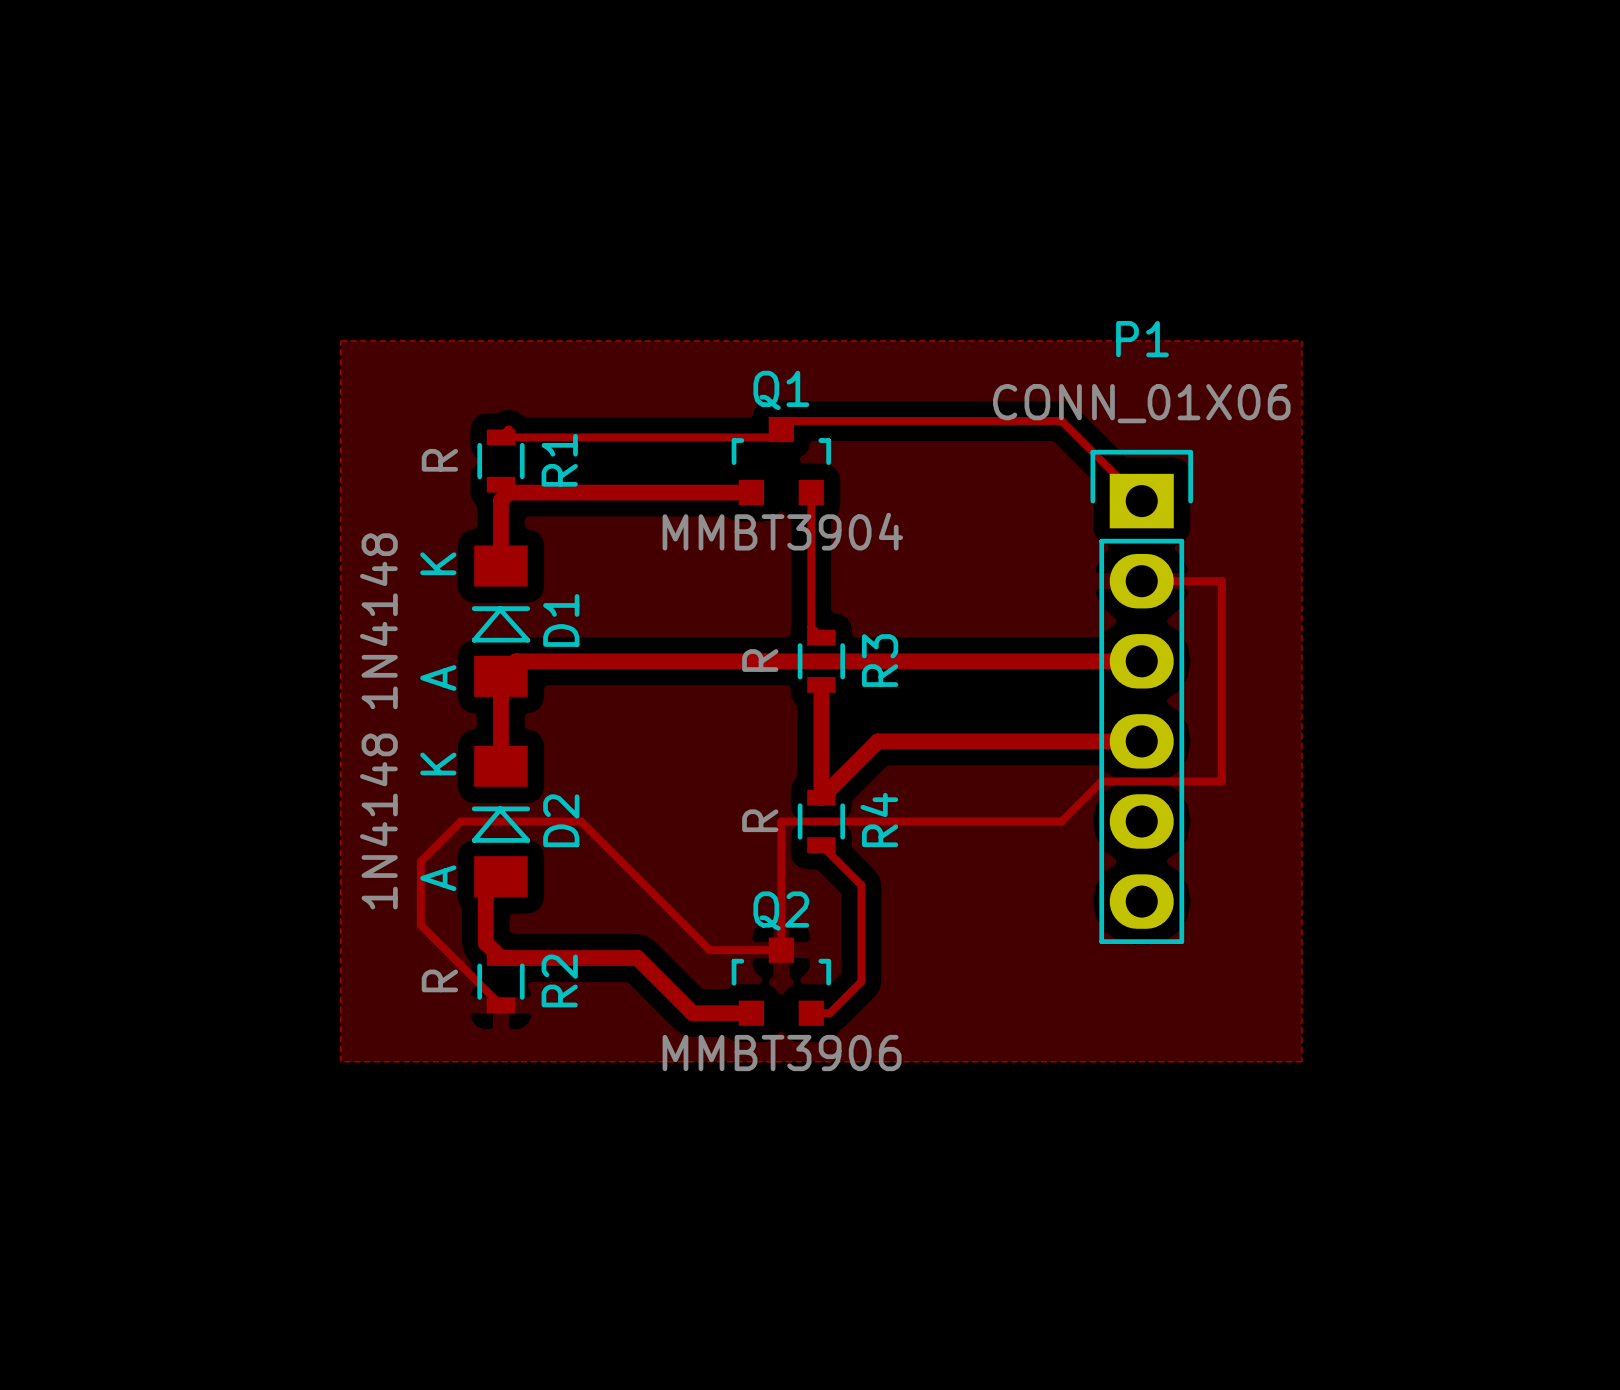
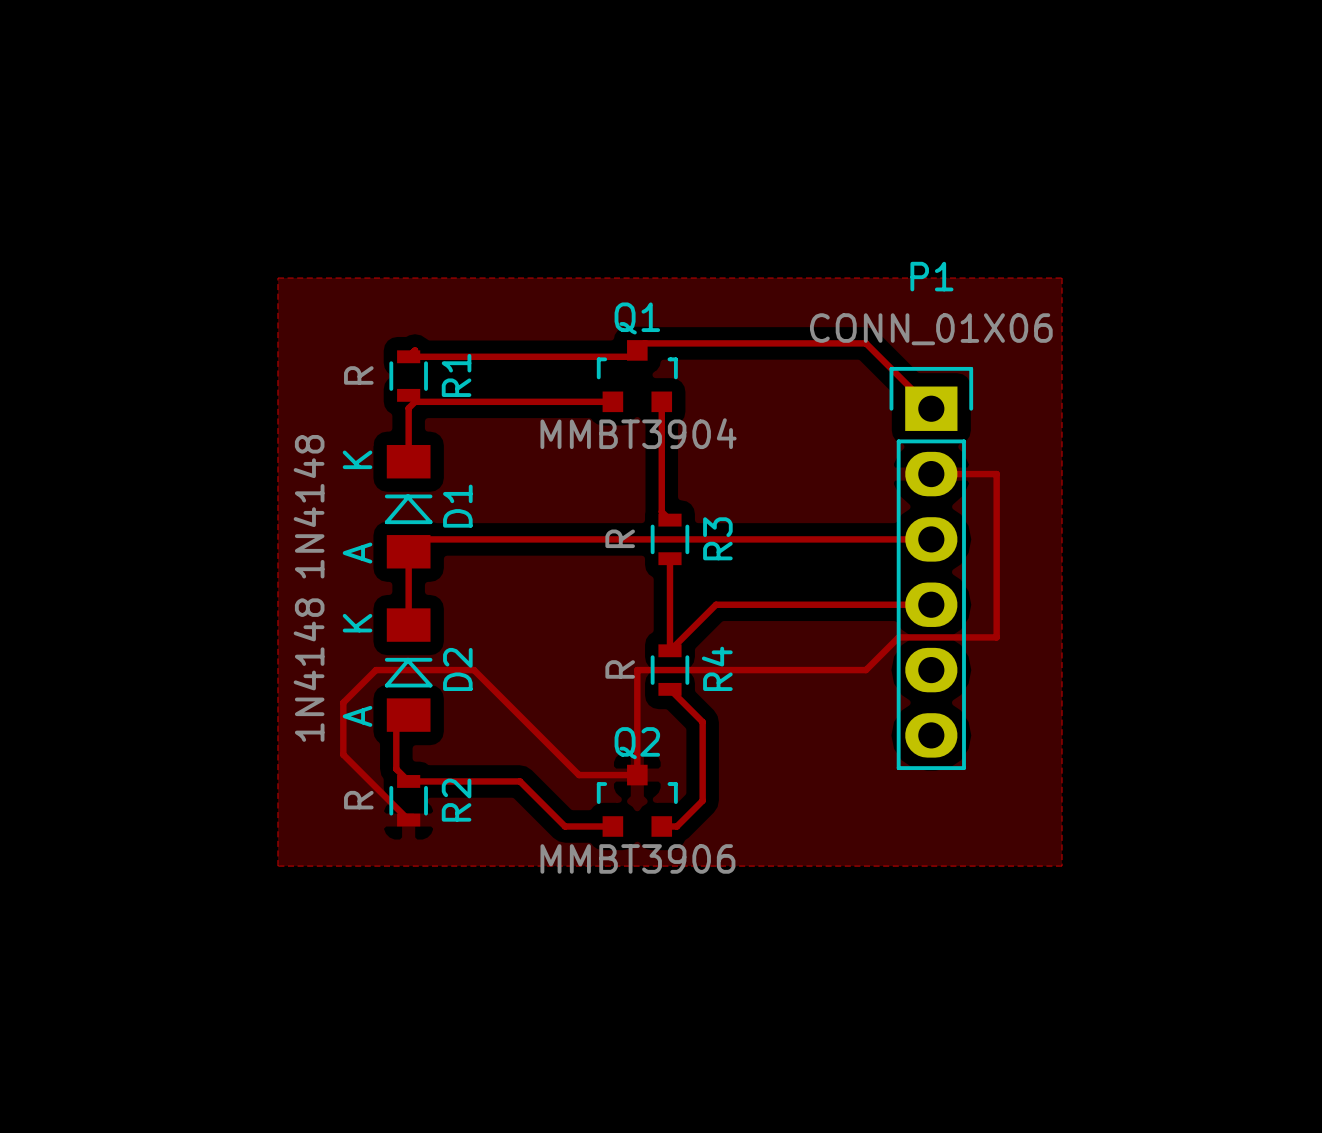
top track width: thick (751, 492) (508, 492) (500, 500) (500, 566) -> thin (612, 401) (415, 401) (408, 408) (408, 461)
top track width: thick (1141, 661) (516, 661) (500, 676) (500, 766) -> thin (931, 539) (421, 539) (408, 551) (408, 625)
top track width: thick (821, 684) (821, 797) (877, 741) (1141, 741) -> thin (669, 558) (669, 650) (716, 604) (931, 604)
top track width: thick (485, 876) (485, 942) (500, 958) (637, 958) (692, 1013) (751, 1013) -> thin (396, 715) (396, 769) (408, 781) (520, 781) (565, 826) (612, 826)

